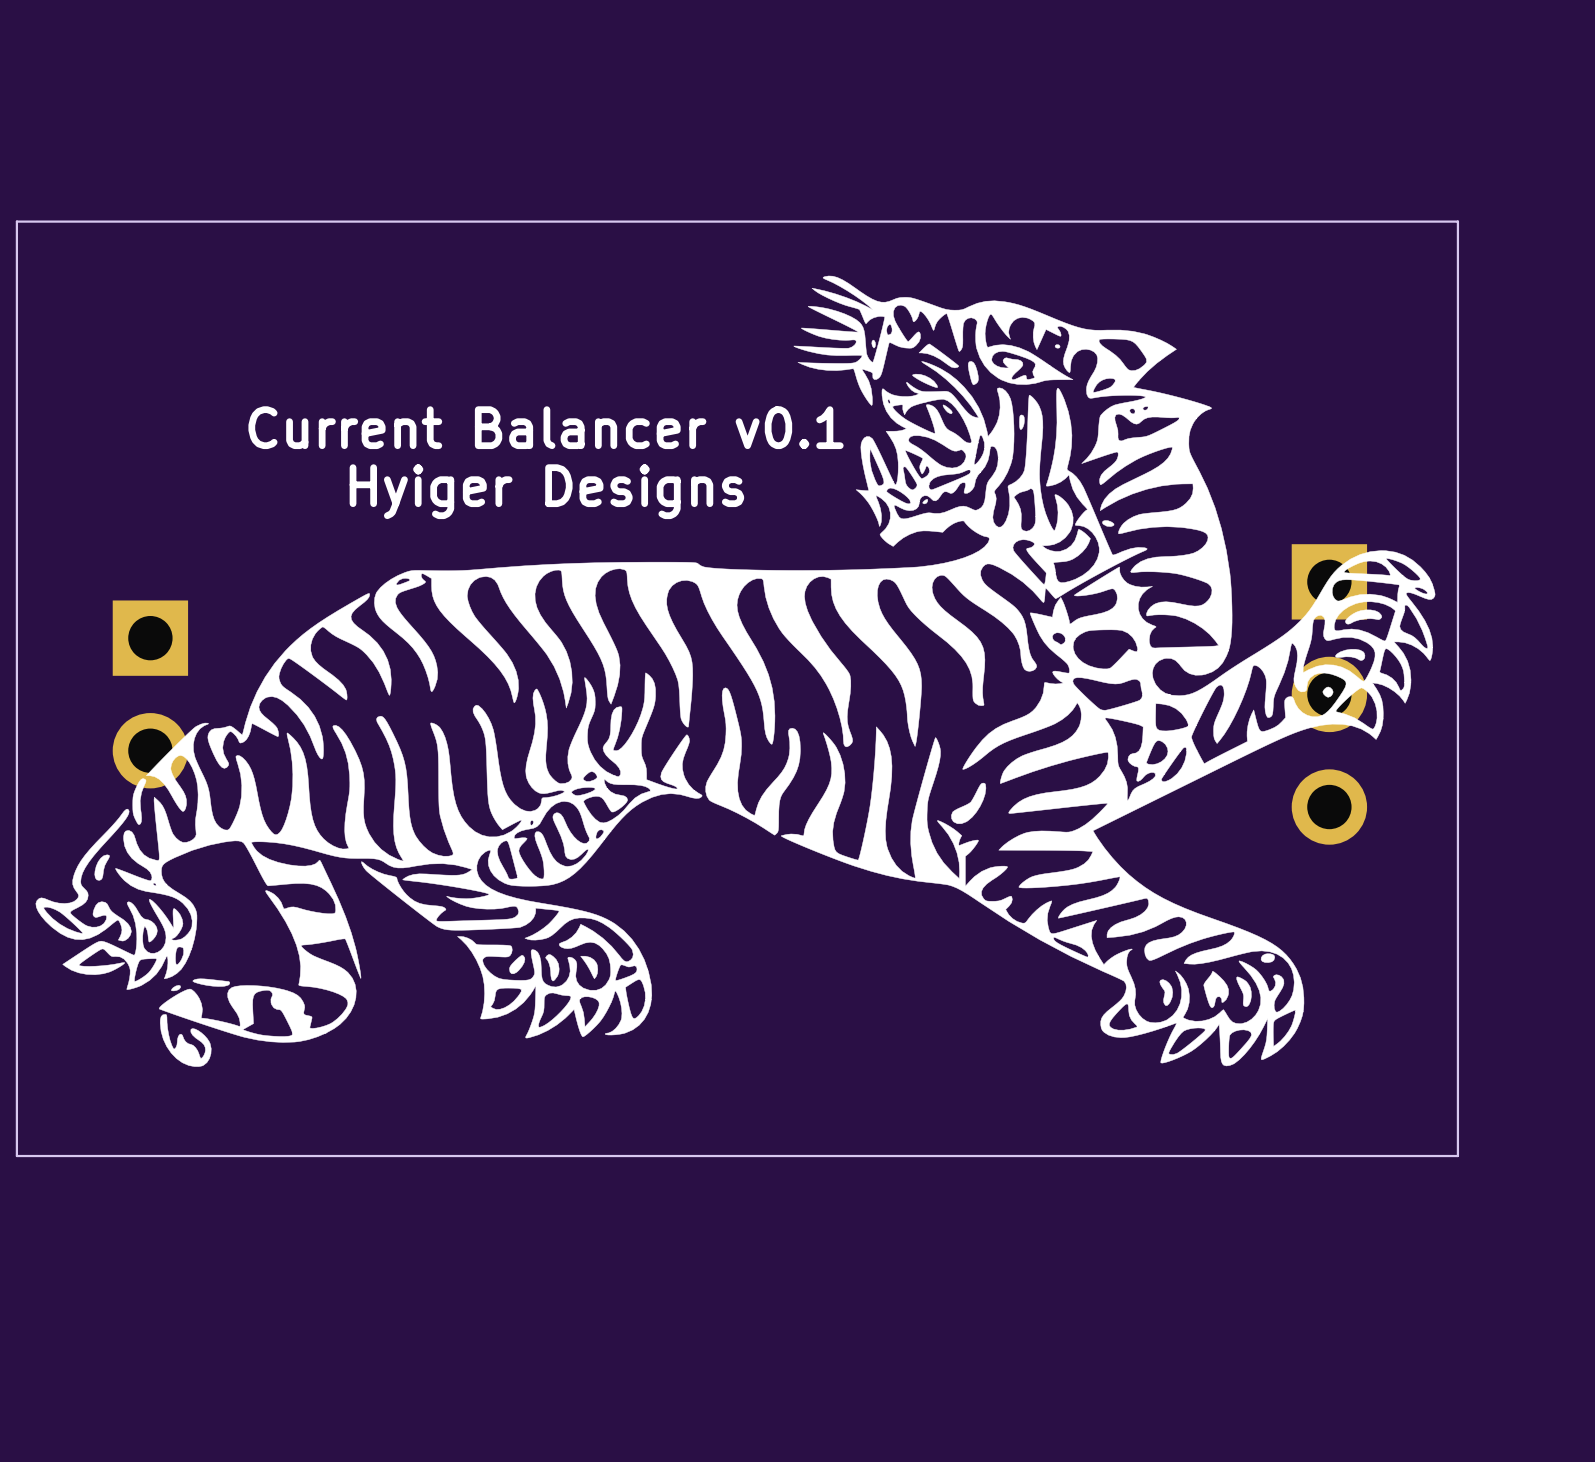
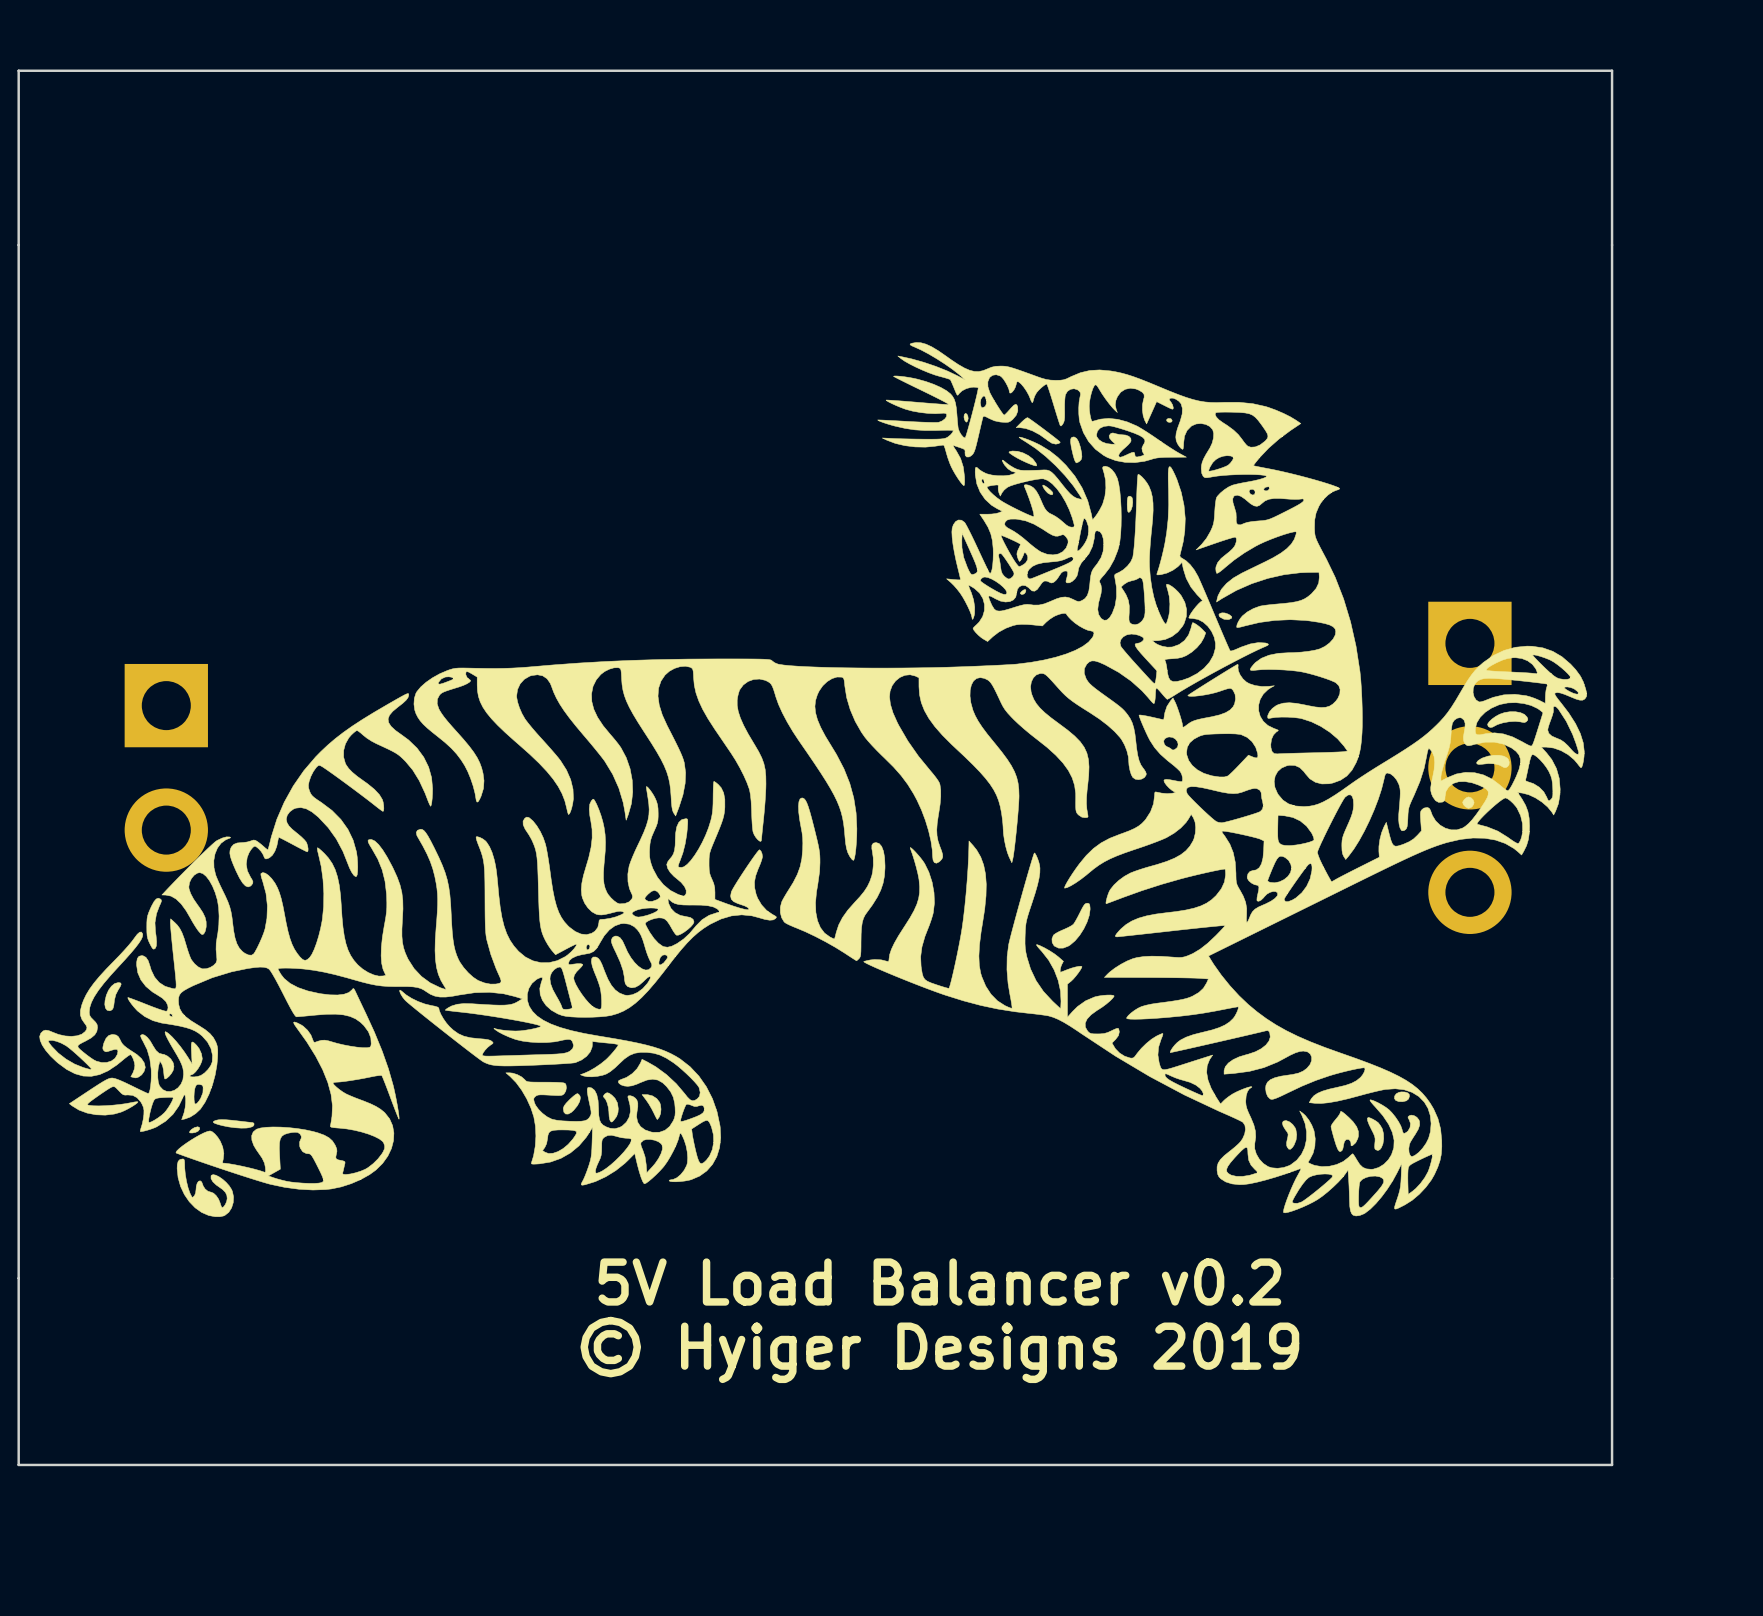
board edge: (1457, 221) (16, 221) -> (1612, 245) (1612, 70) (18, 70) (18, 245)
text: Current Balancer v0.1 (546, 427) -> none
text: Hyiger Designs (546, 491) -> none
drawing position: (735, 671) -> (813, 779)
board edge: (1457, 1156) (16, 1156) -> (1612, 1278) (1612, 1464) (18, 1464) (18, 1278)
text: none -> 5V Load Balancer v0.2 (939, 1282)
text: none -> © Hyiger Designs 2019 (939, 1349)

